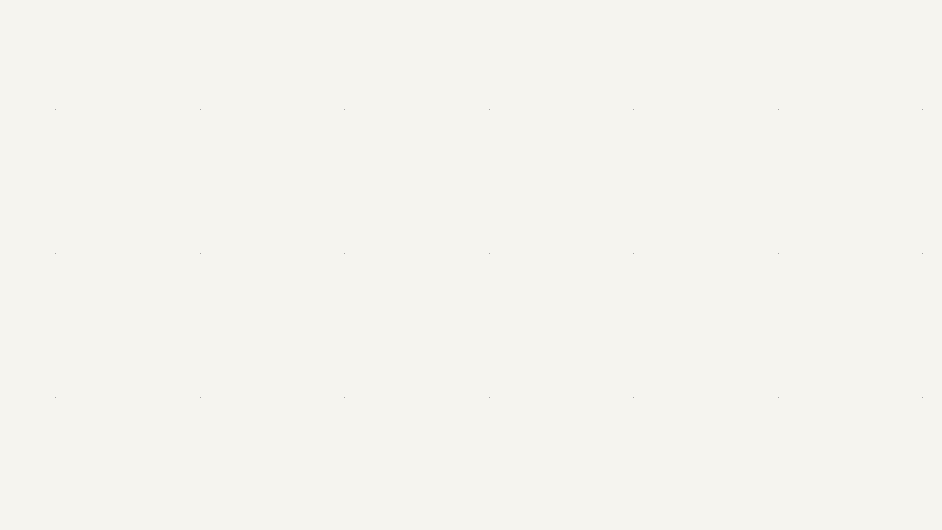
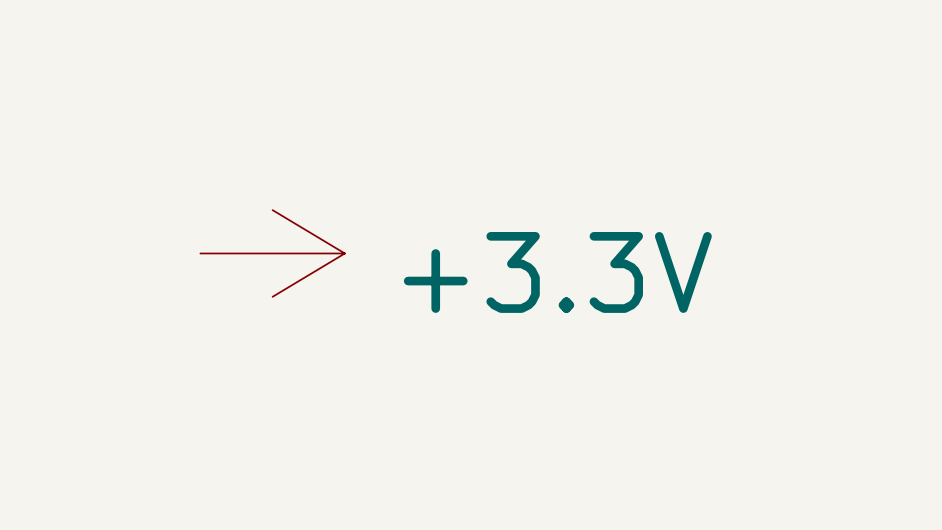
power symbol: none -> +3.3V (272, 253)

